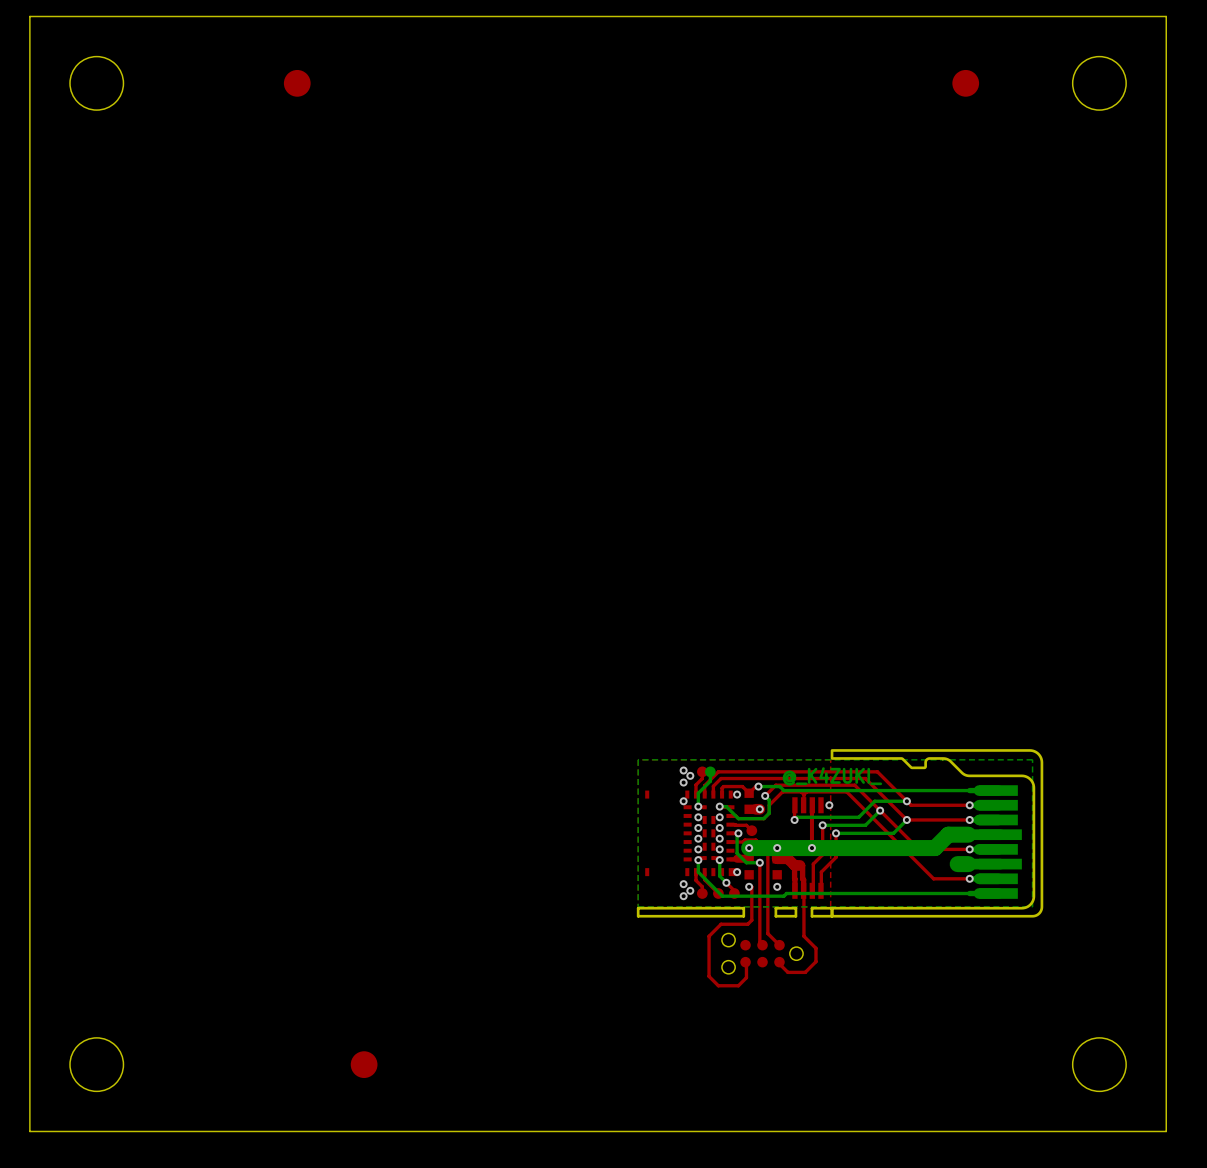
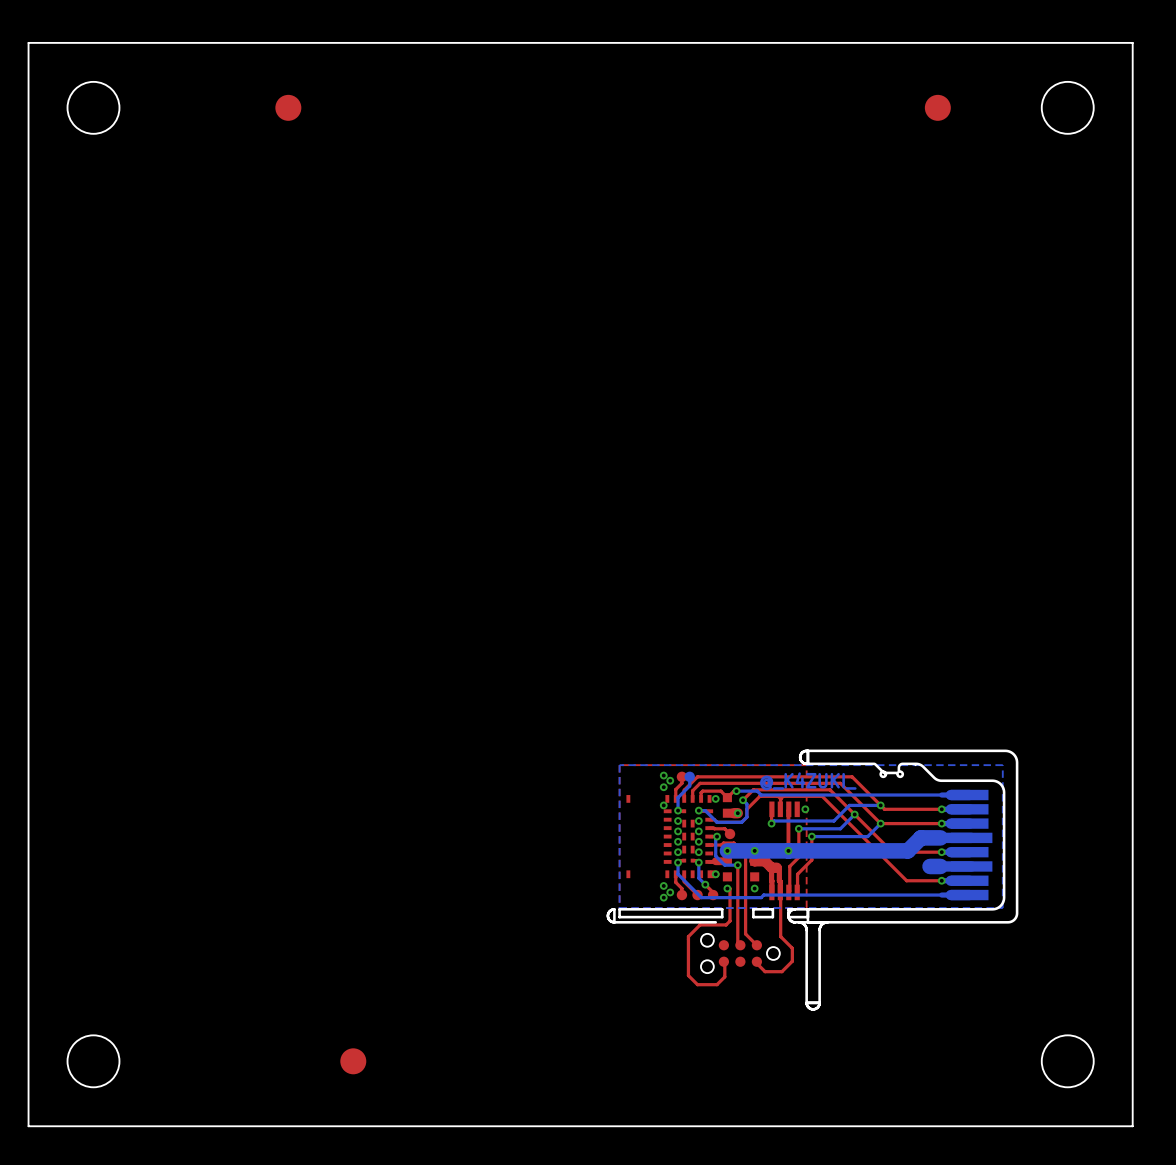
board edge: none -> (807, 750) (807, 763) (804, 763) (801, 760) (800, 755) (803, 751) (807, 750)
part footprint: [830, 749, 1044, 918] -> [806, 749, 1019, 924]
board edge: none -> (794, 909) (788, 914) (789, 919) (792, 921) (827, 922) (821, 924) (819, 929) (819, 1002)
board edge: none -> (614, 922) (609, 920) (607, 915) (609, 911) (614, 909) (614, 922)
board edge: none -> (715, 922) (614, 922)
board edge: none -> (798, 922) (804, 924) (806, 929) (806, 1002)
board edge: none -> (819, 1002) (817, 1007) (813, 1009) (808, 1007) (806, 1002)

